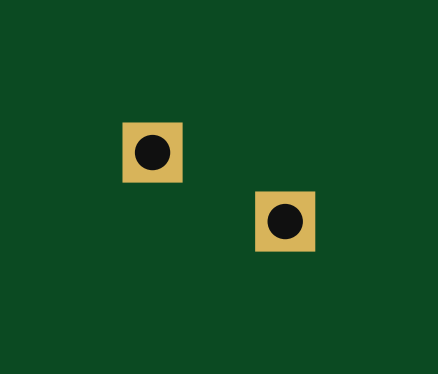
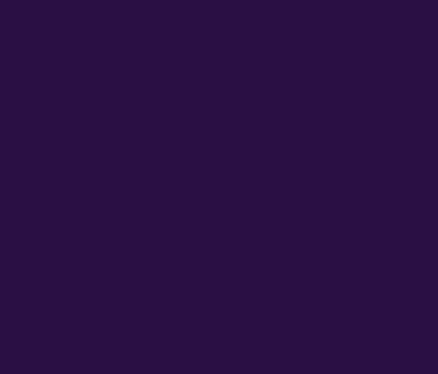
part: (152, 152) -> none
part: (285, 221) -> none

